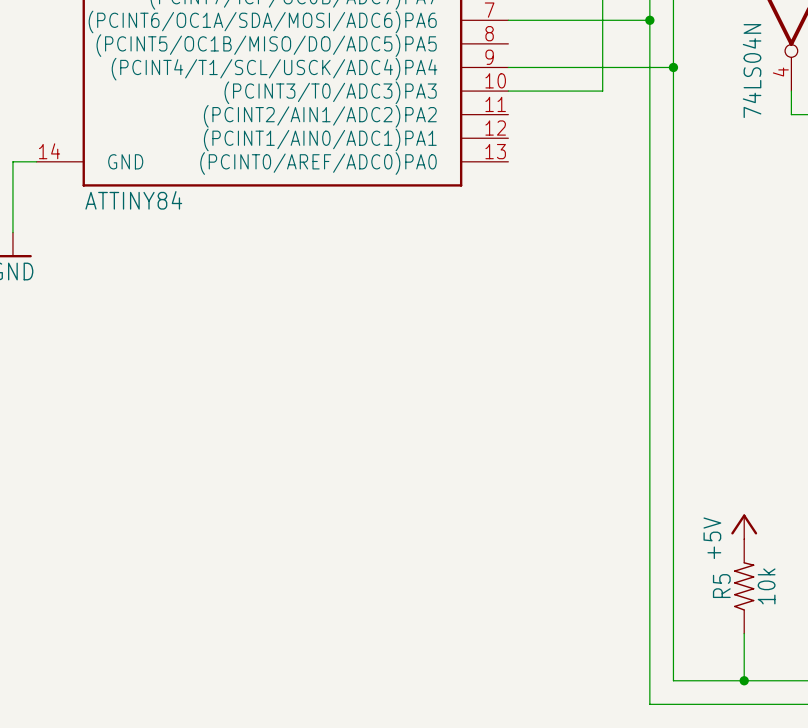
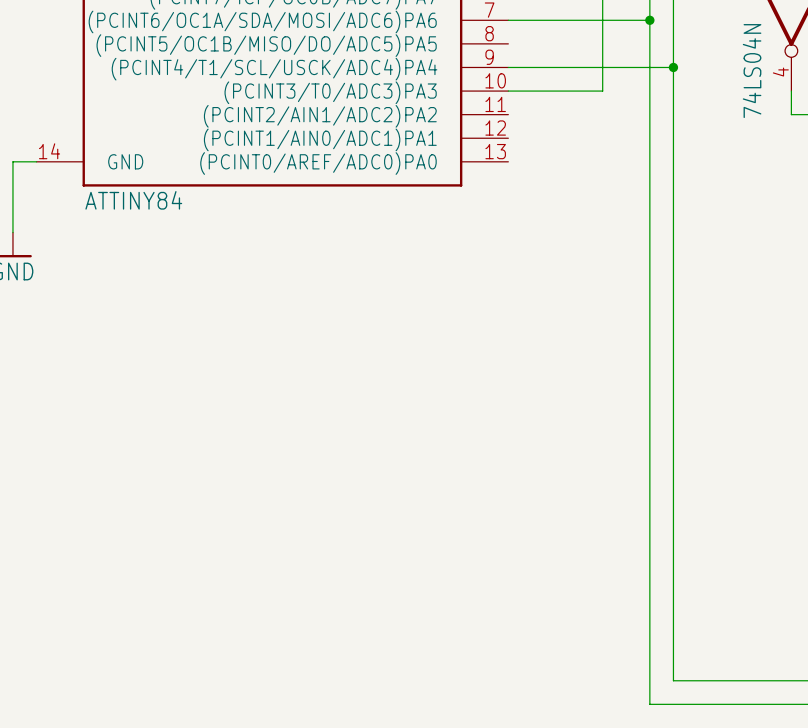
power symbol: +5V (744, 526) -> none
R5: 10k (744, 586) -> none
wire: (744, 633) (744, 680) -> none
junction: (744, 680) -> none

